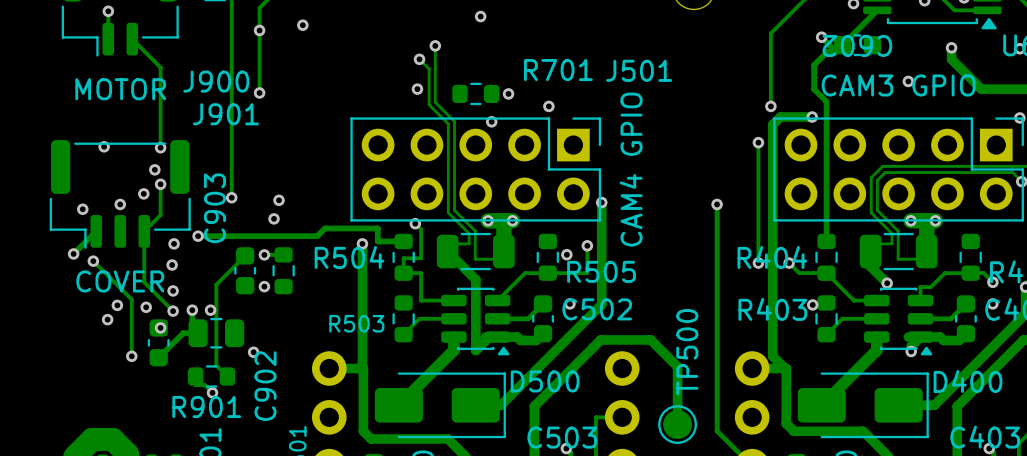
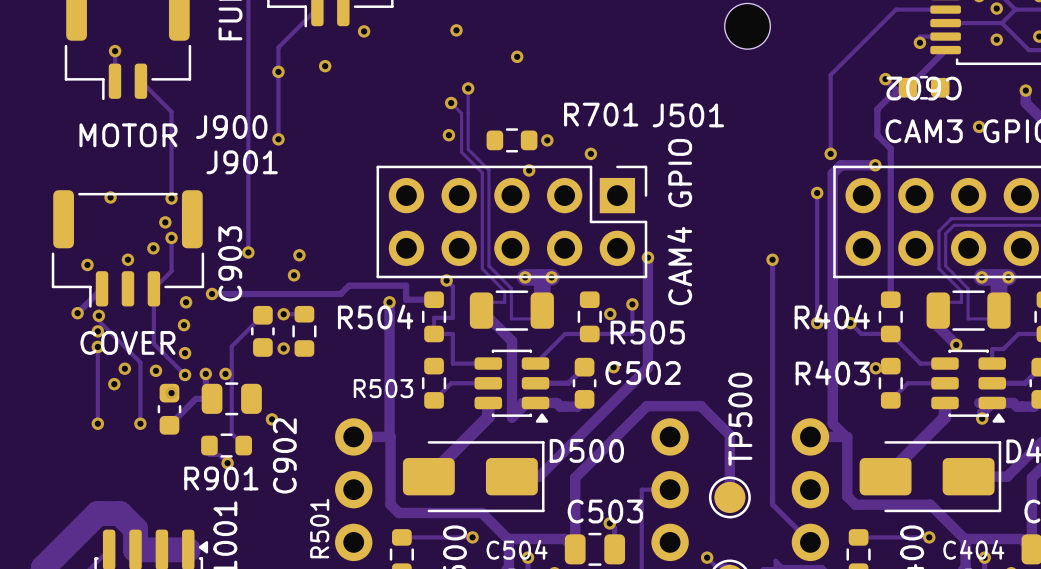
via: none -> (98, 315)
via: (93, 261) -> none
via: none -> (97, 331)
track: none -> (97, 346) (97, 423)
via: none -> (97, 346)
via: none -> (97, 423)

